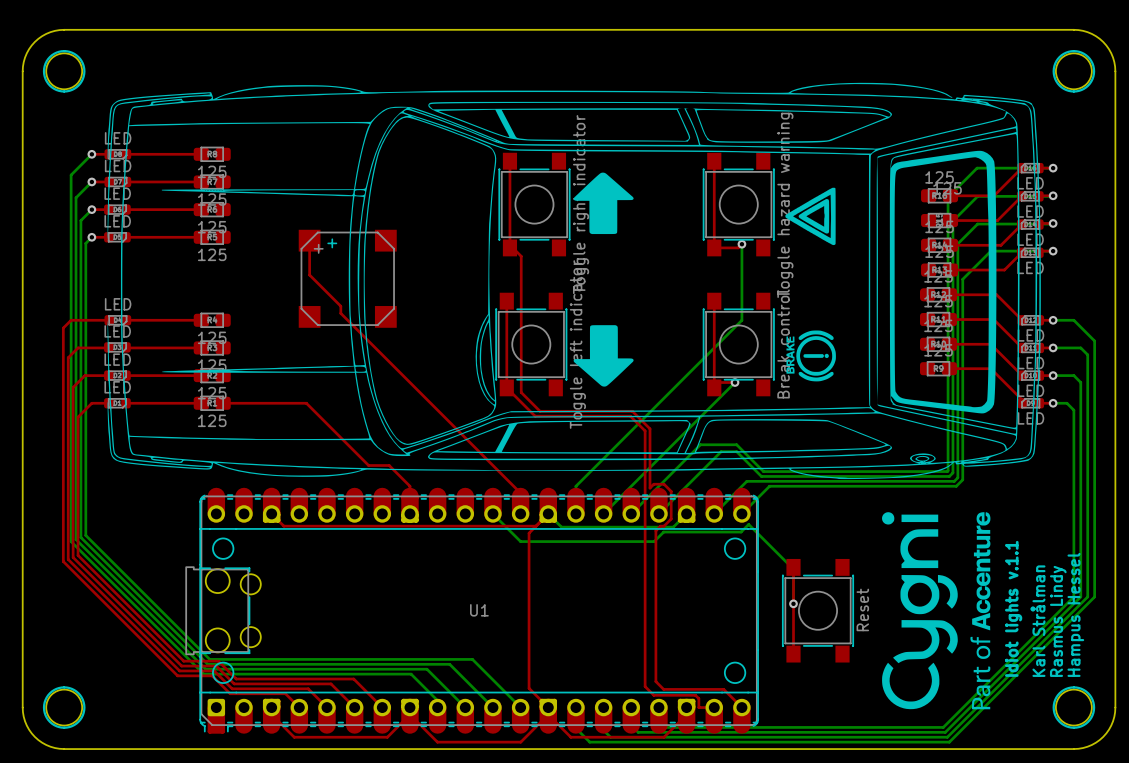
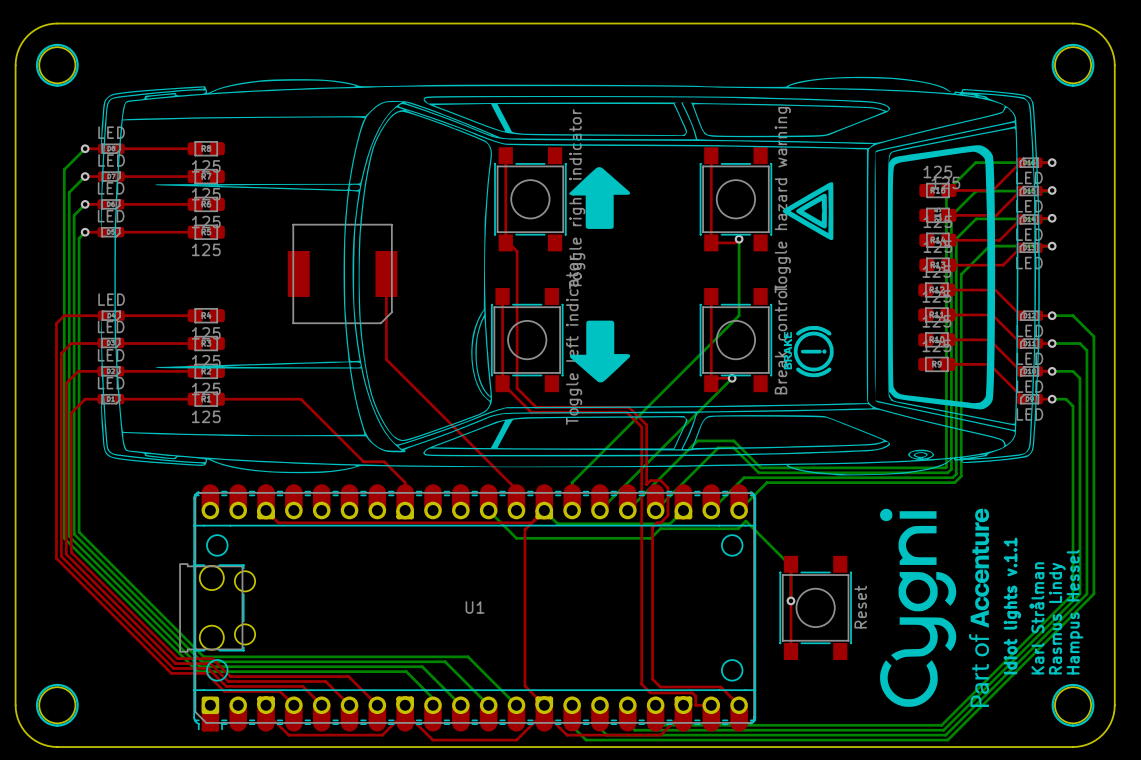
part footprint: [298, 229, 397, 328] -> [287, 224, 398, 324]
top track: (309, 240) (309, 275) (340, 306) (340, 313) (391, 363) -> (386, 273) (386, 359)

